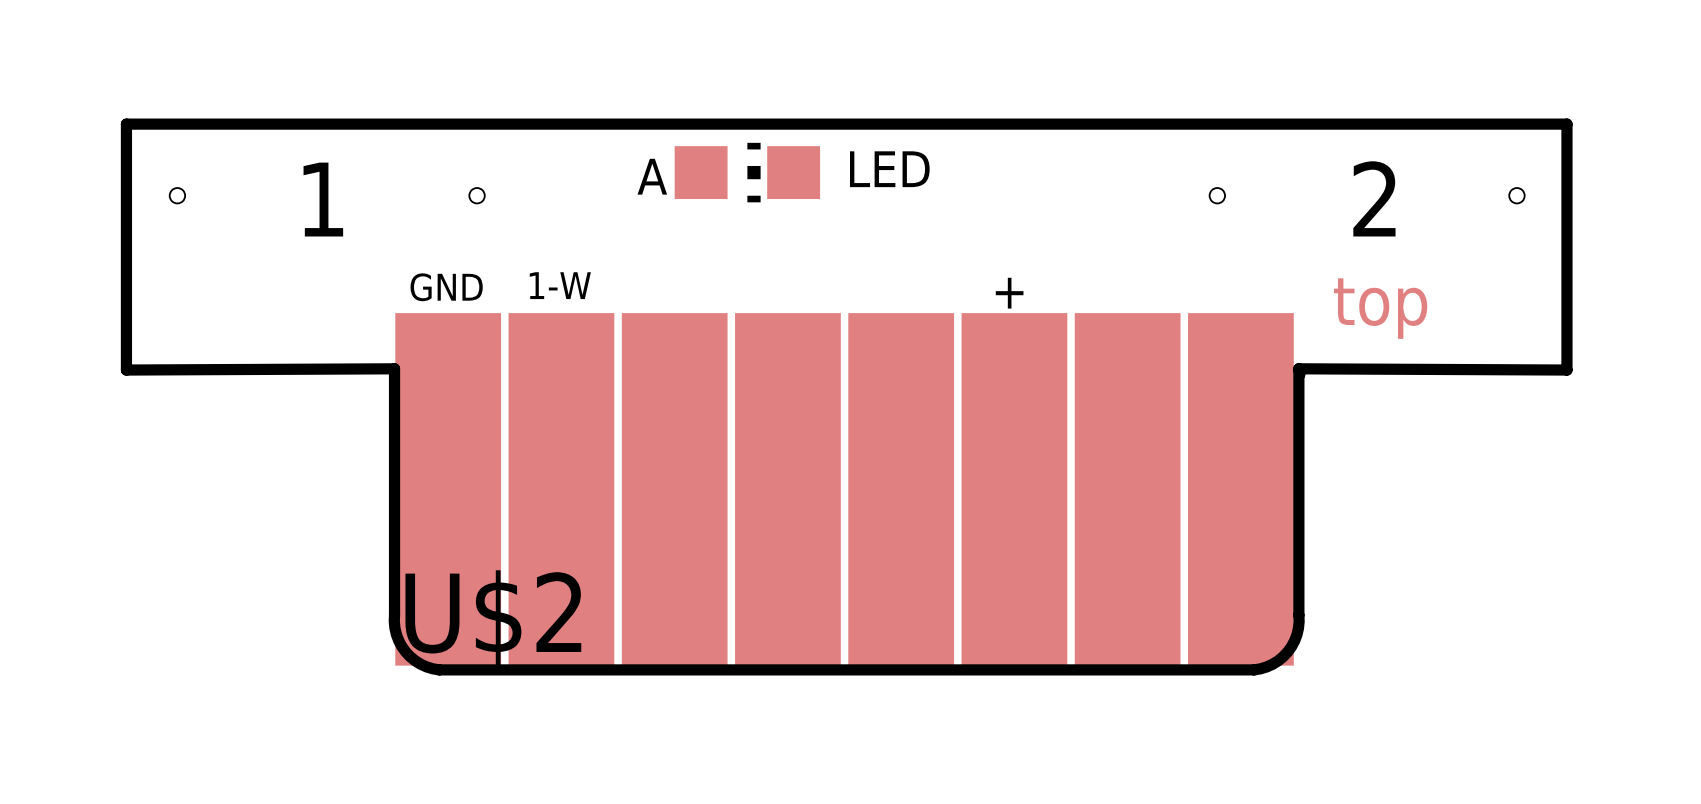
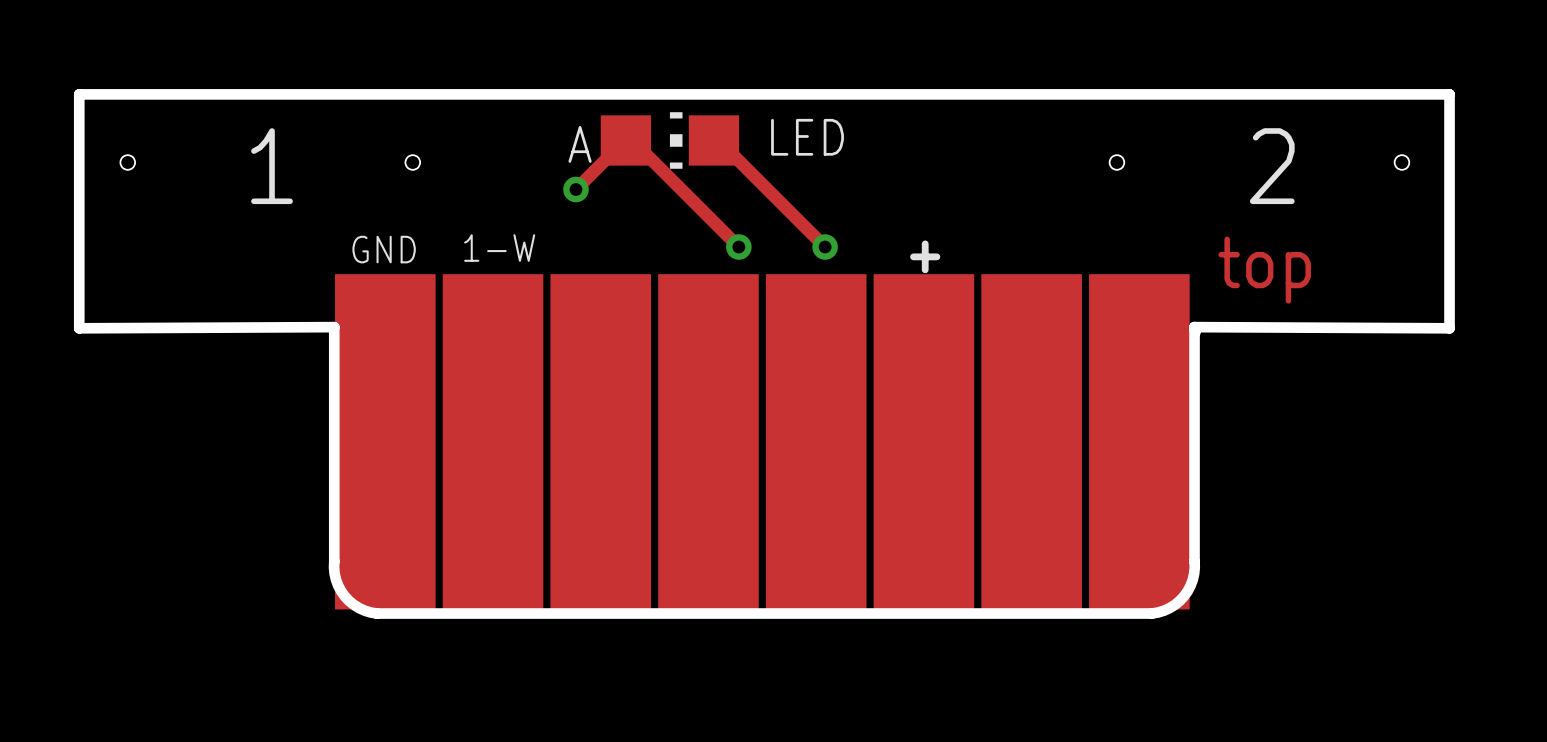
track: none -> (713, 140) (719, 141) (825, 247)
track: none -> (575, 189) (623, 141) (633, 141) (738, 247)
via: none -> (575, 189)
via: none -> (738, 247)
via: none -> (825, 247)
U$2 name: U$2 (493, 619) -> none

